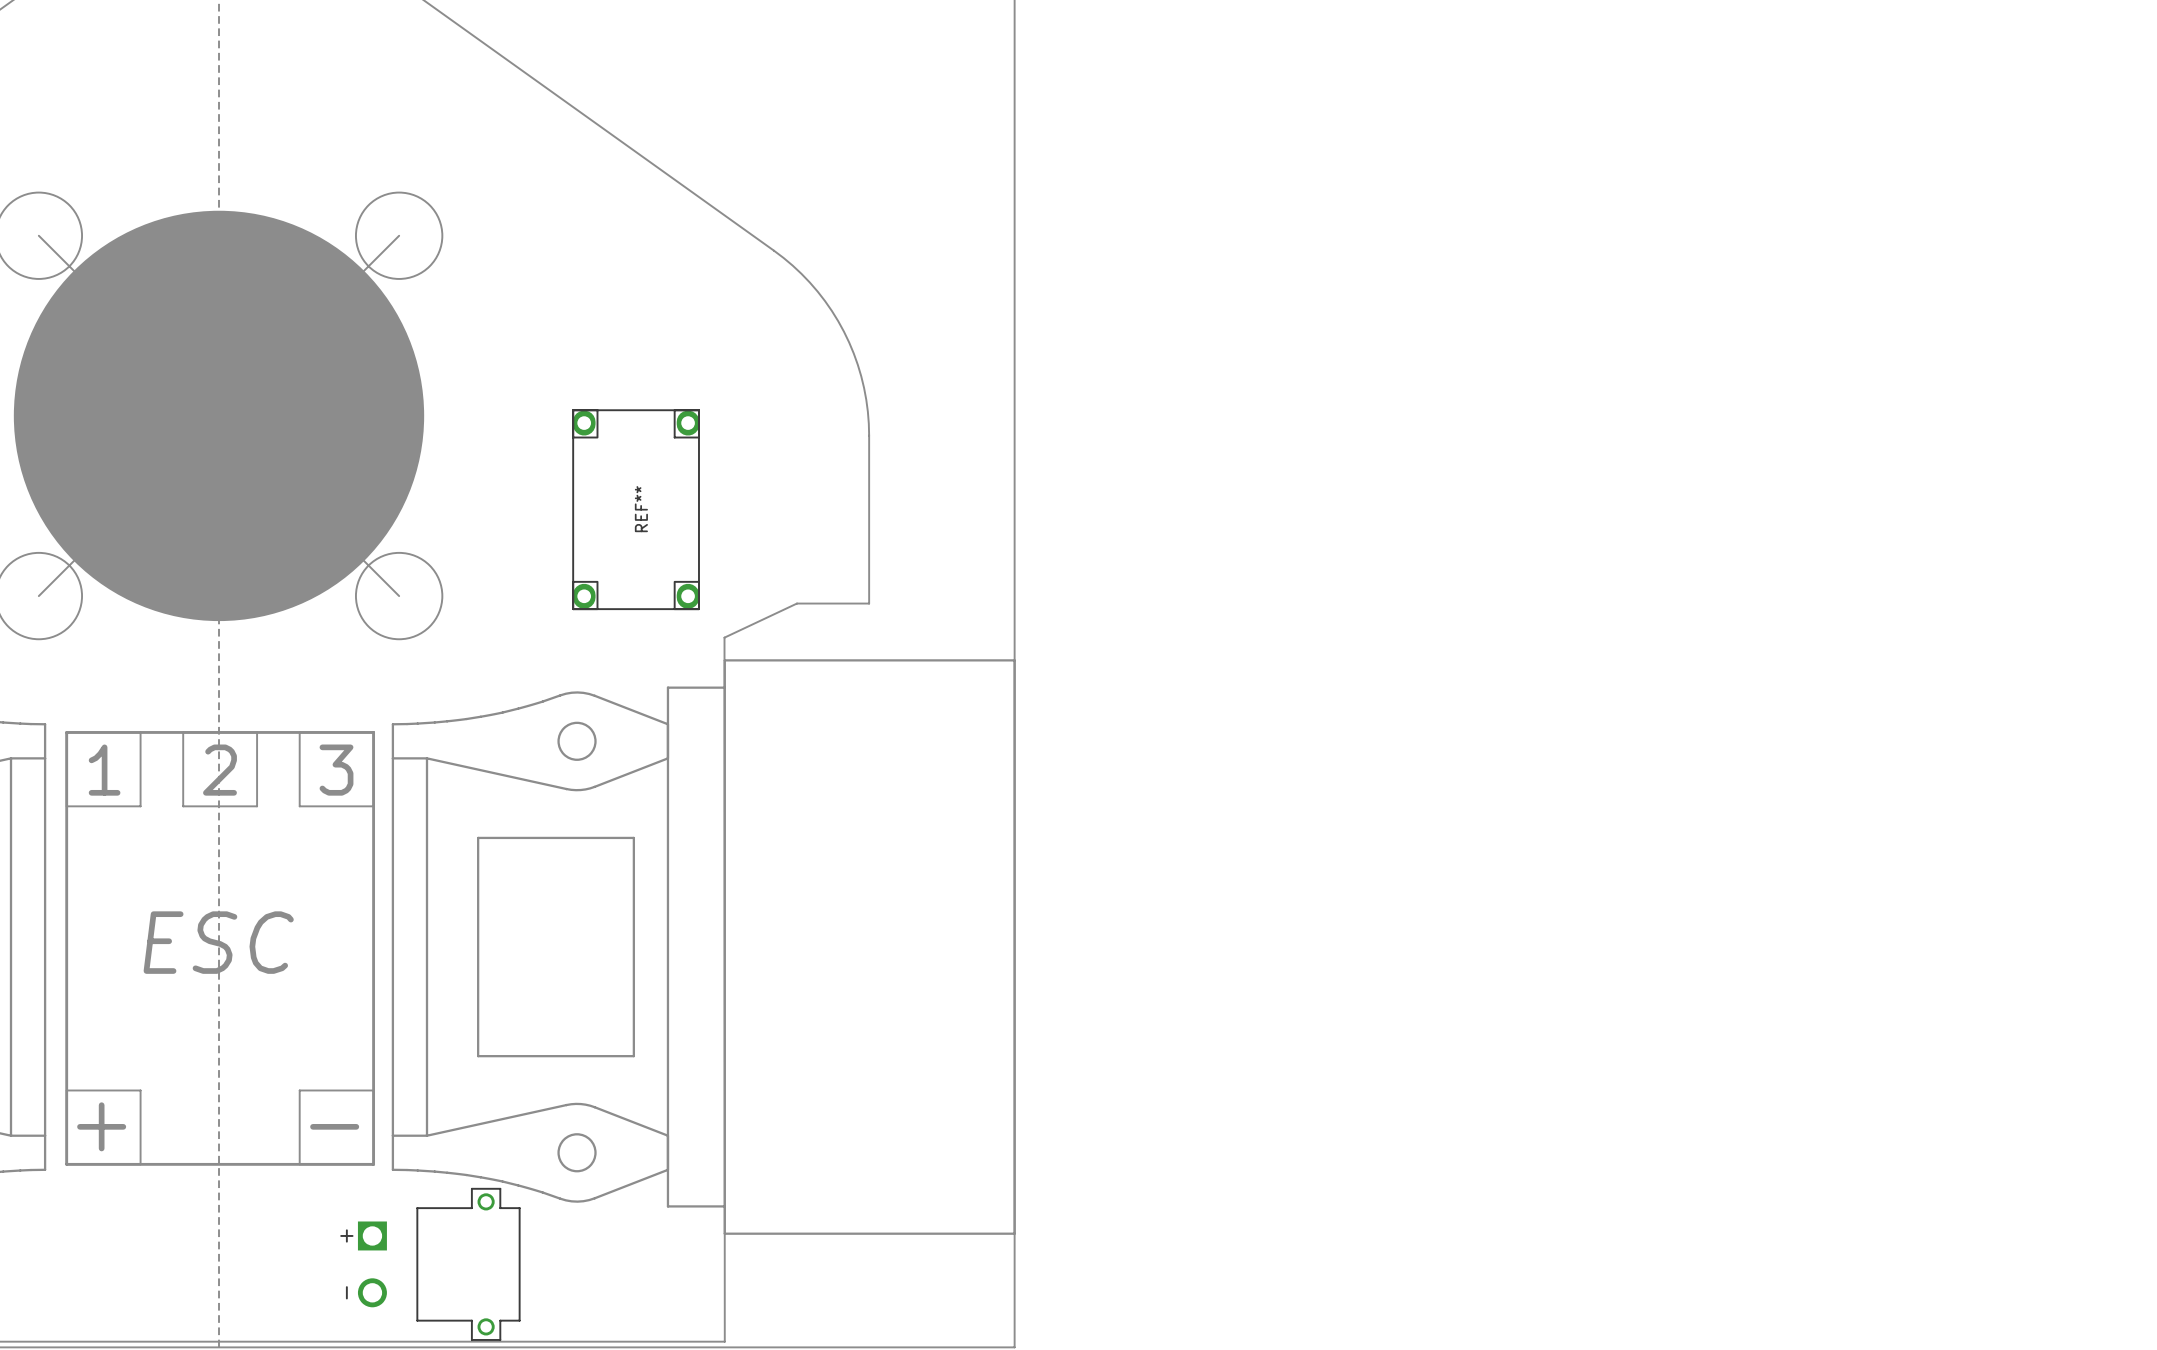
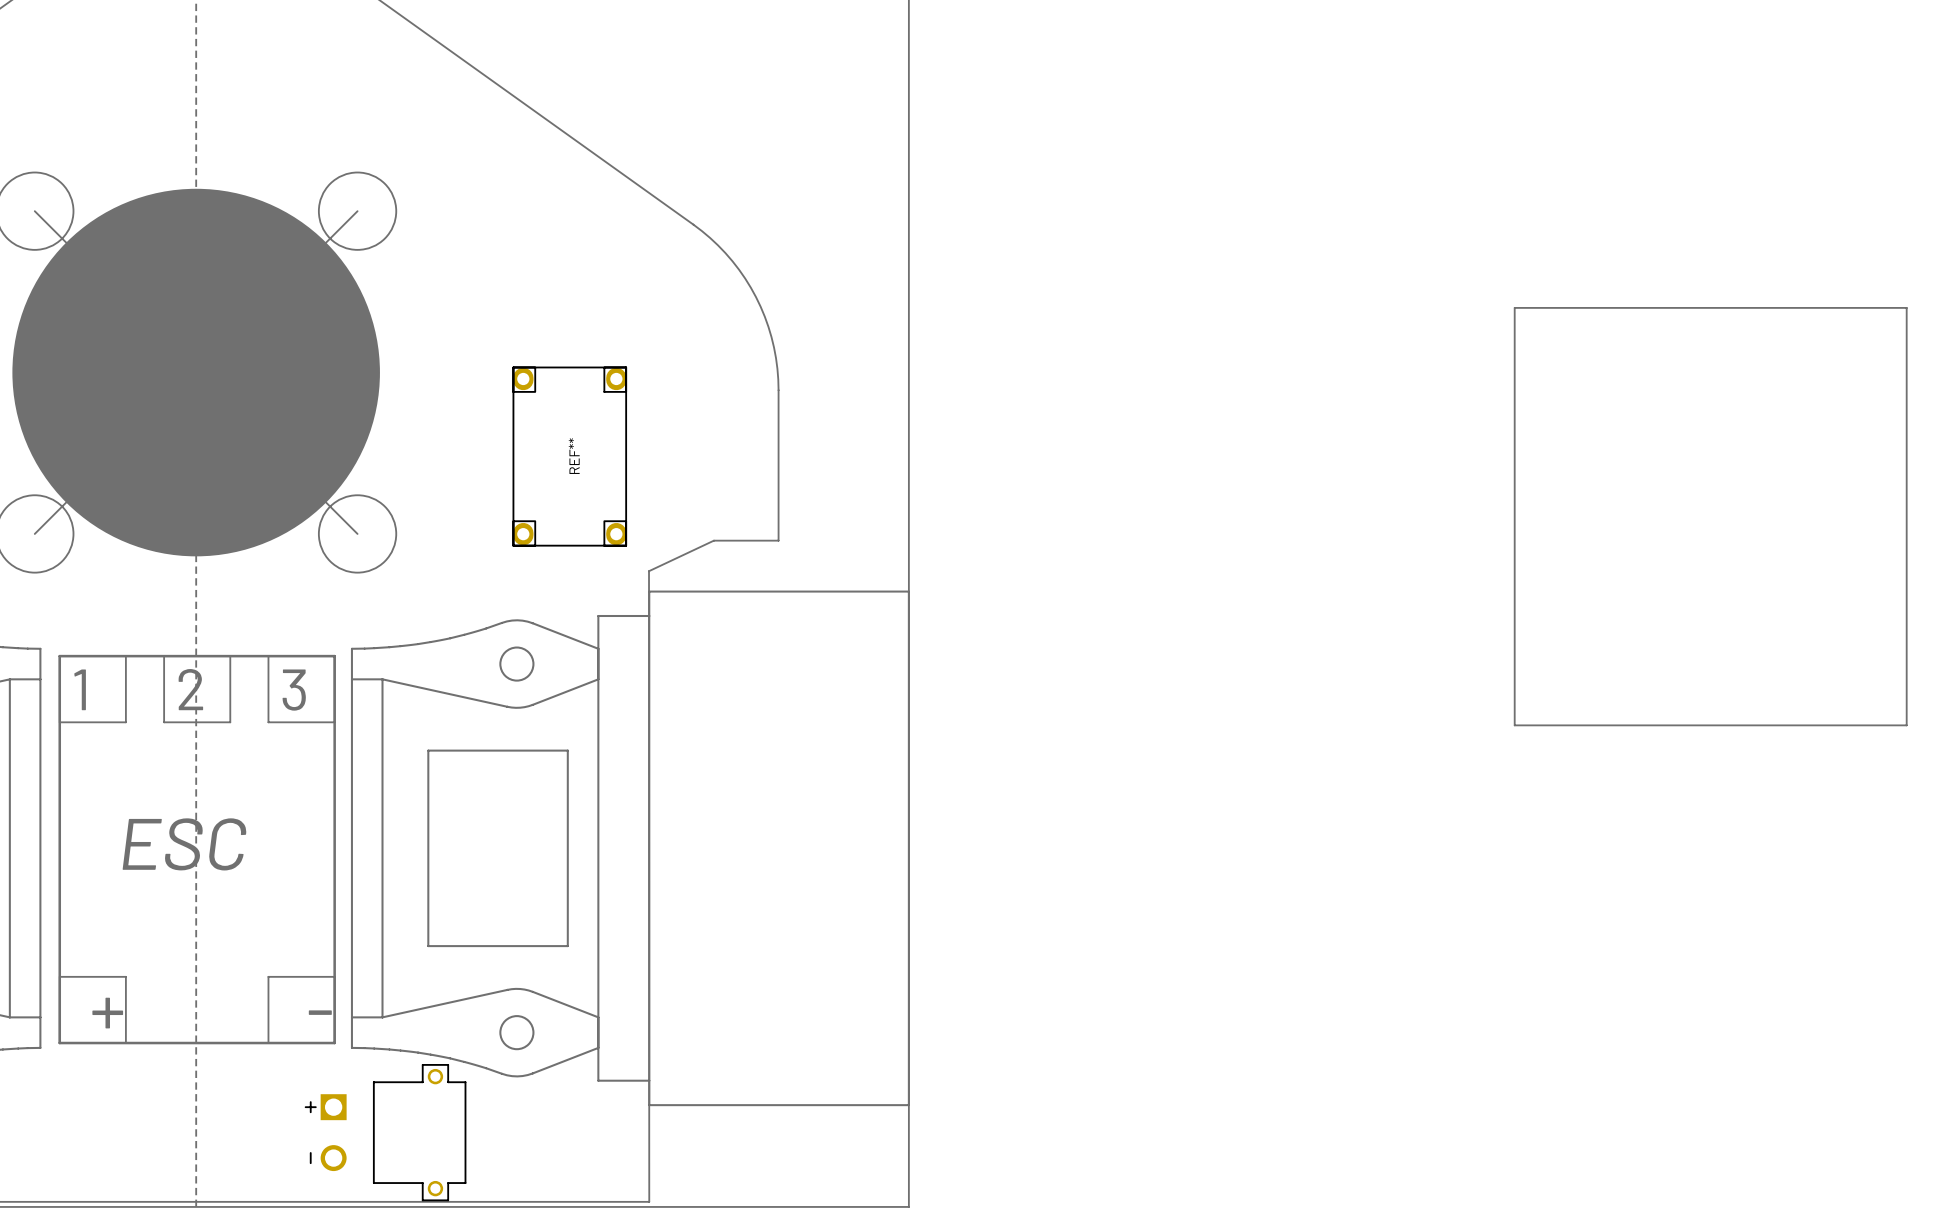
line: none -> (1514, 307) (1906, 307) (1906, 725) (1514, 725) (1514, 307)

